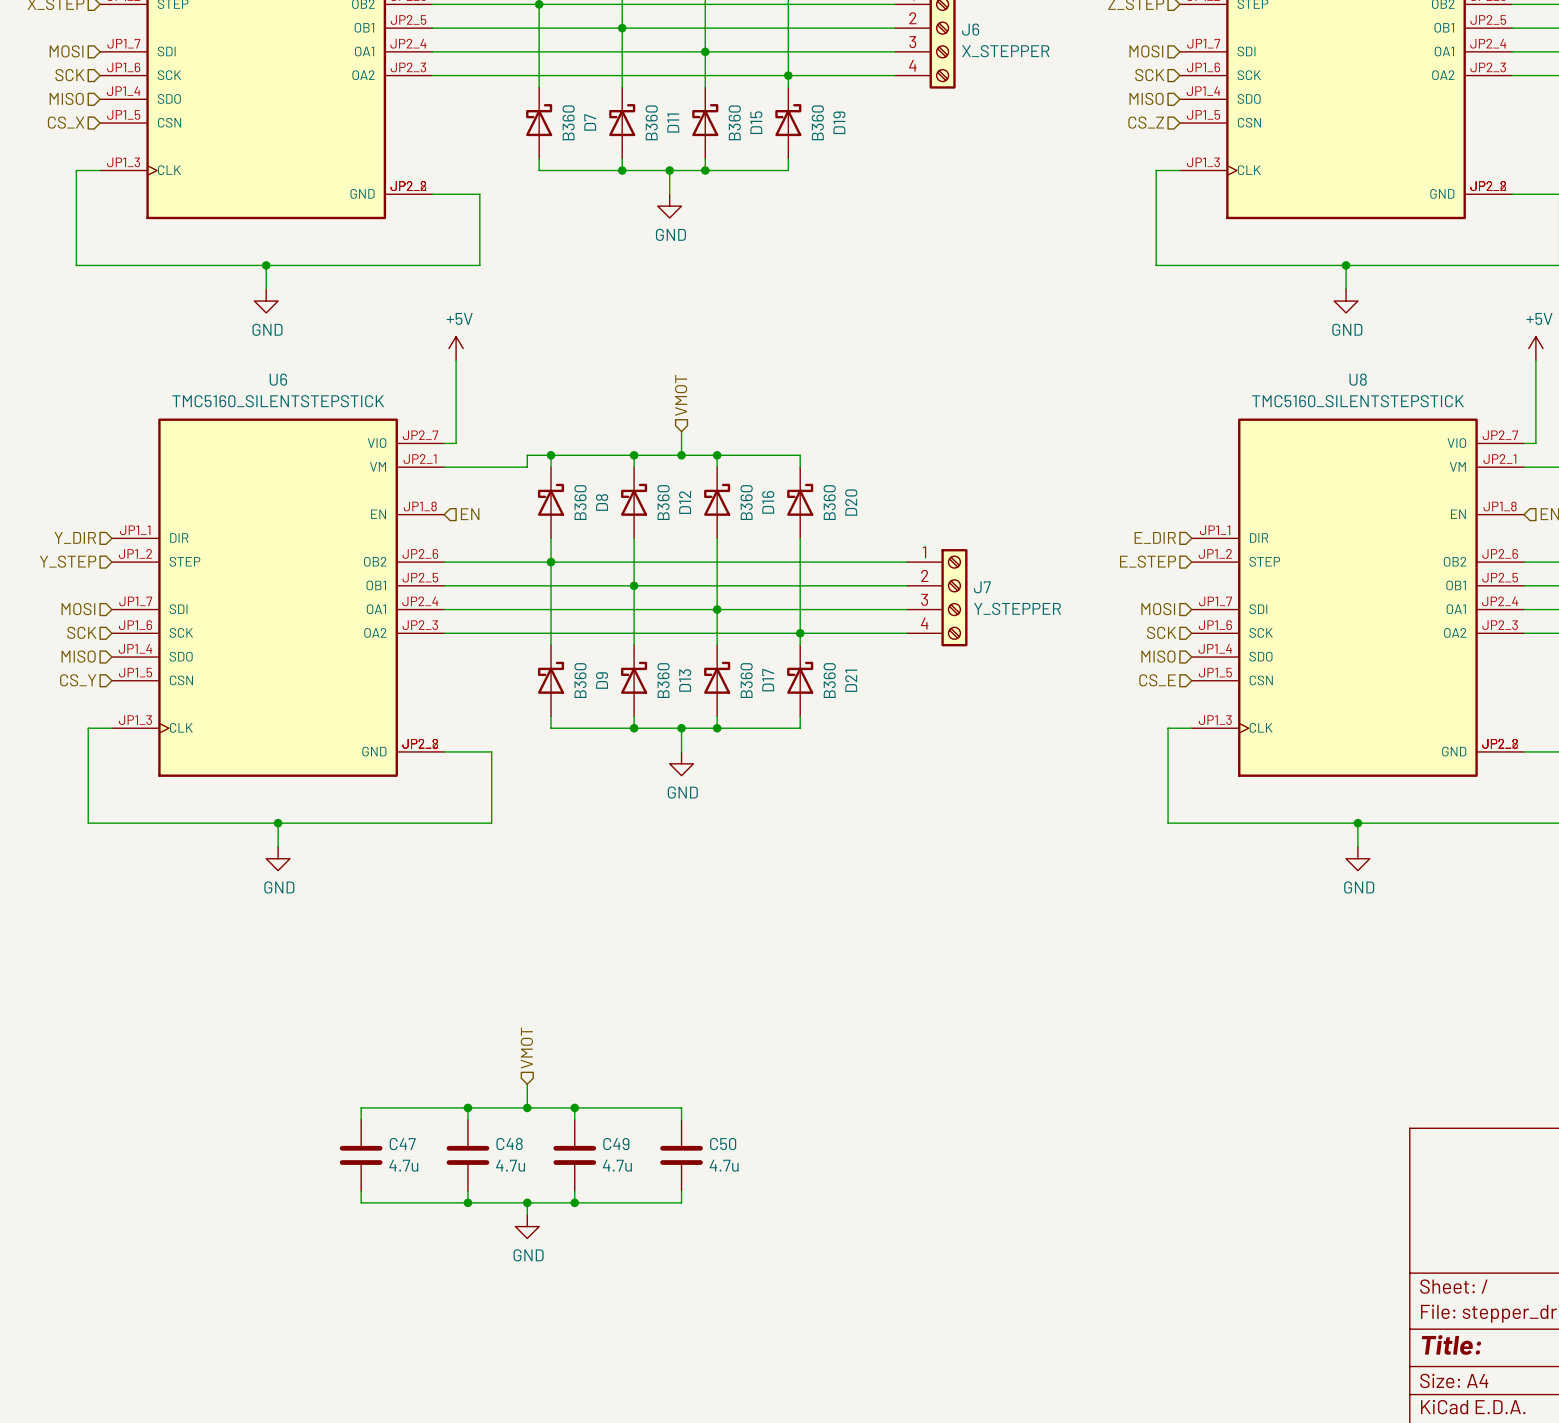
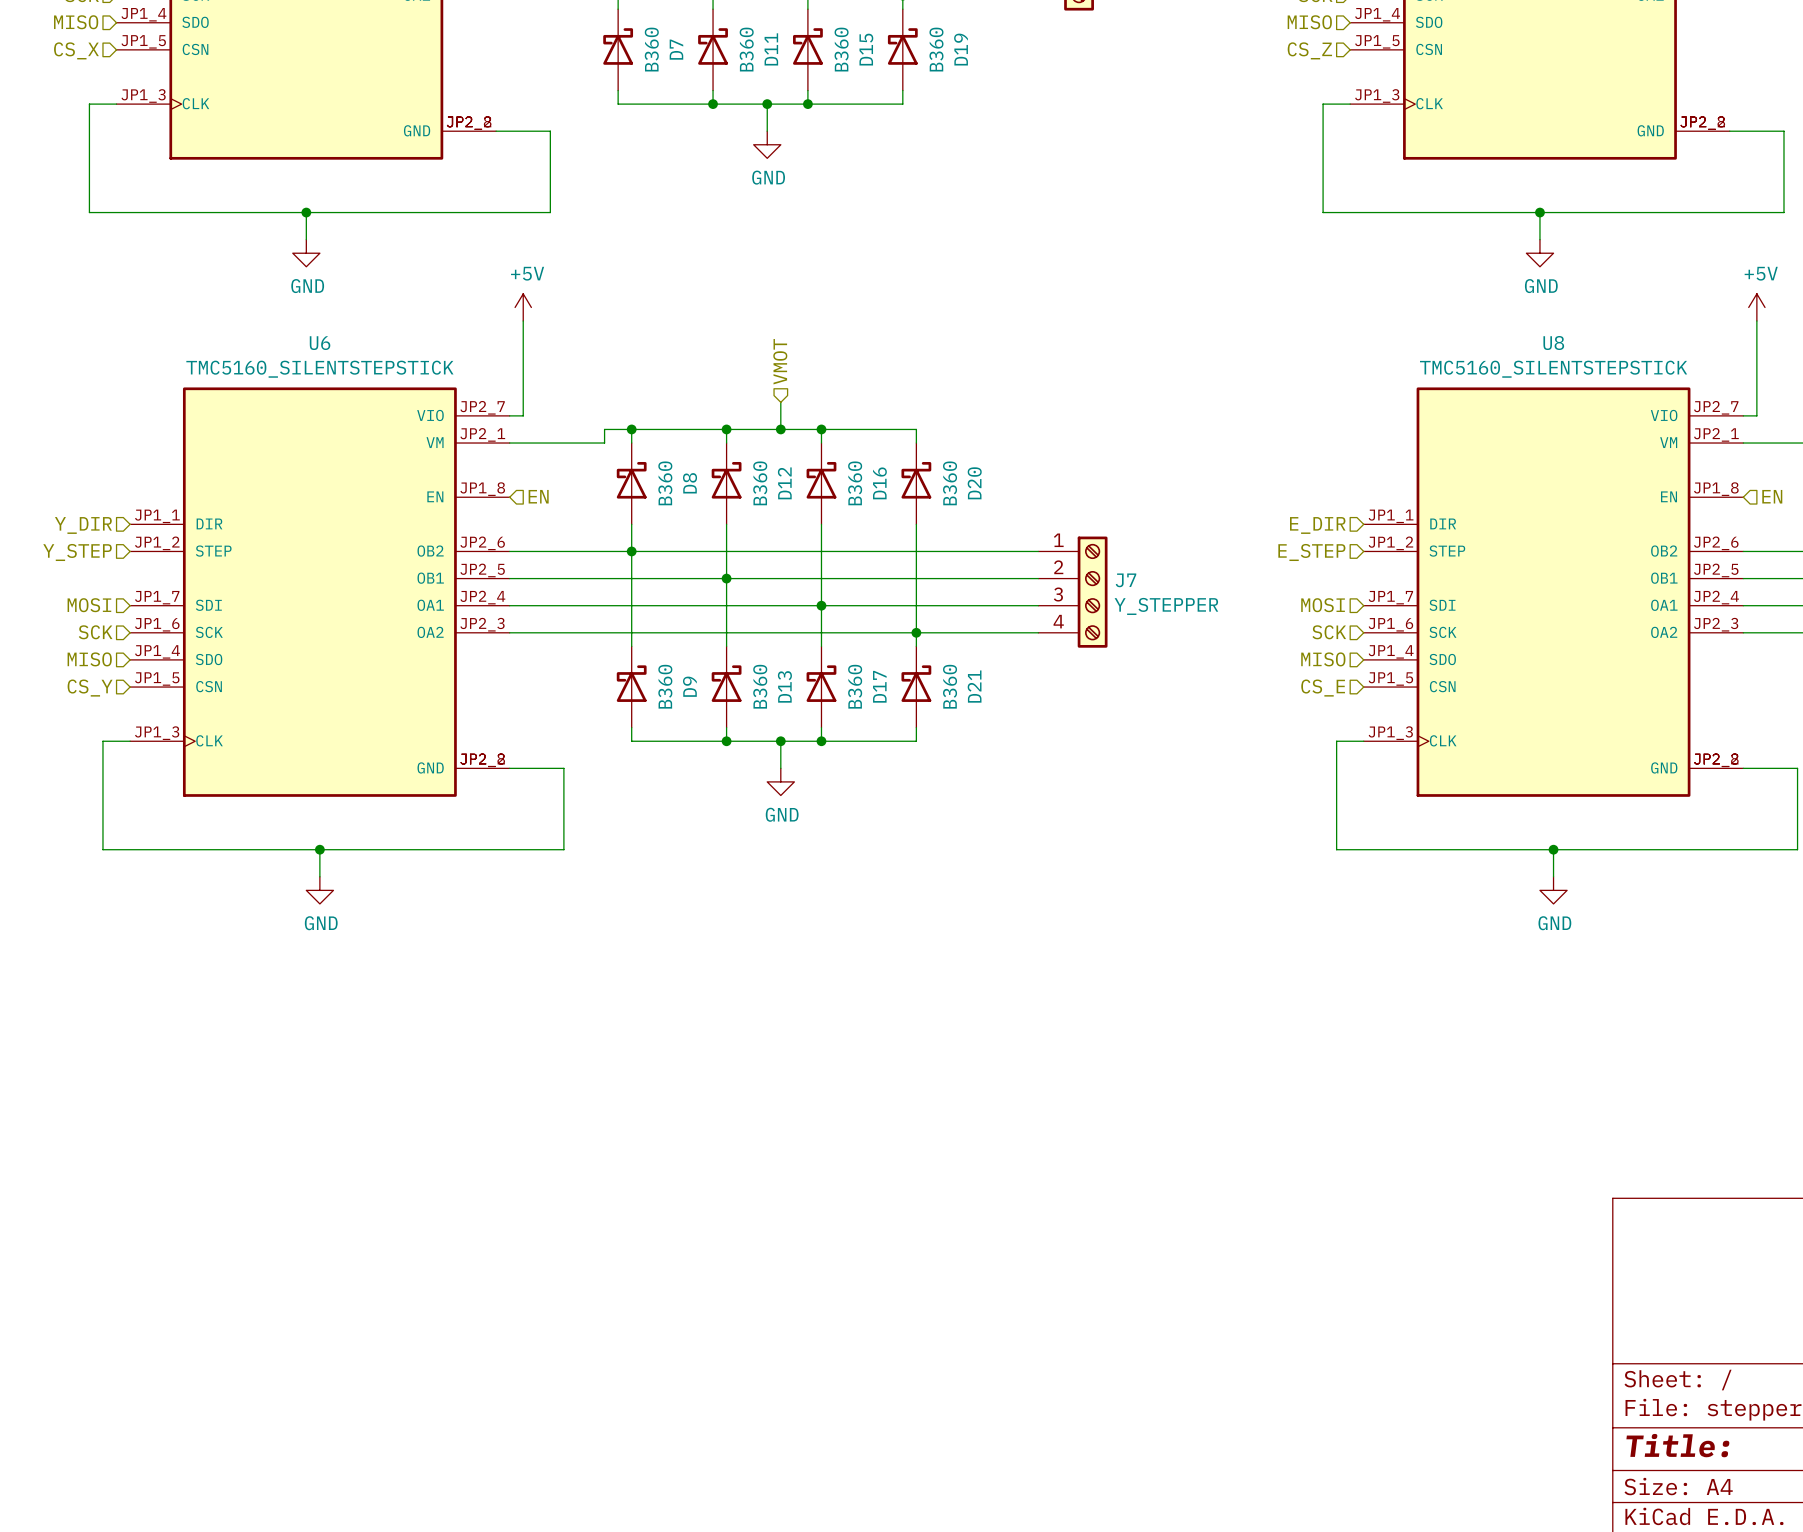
hierarchical label: VMOT (526, 1048) -> none
wire: (527, 1084) (527, 1107) -> none
wire: (467, 1107) (467, 1119) -> none
junction: (467, 1107) -> none
junction: (527, 1107) -> none
wire: (574, 1107) (574, 1119) -> none
junction: (574, 1107) -> none
wire: (361, 1119) (361, 1107) (681, 1107) (681, 1119) -> none
C47: 4.7u (361, 1155) -> none
C48: 4.7u (467, 1155) -> none
C49: 4.7u (574, 1155) -> none
C50: 4.7u (681, 1155) -> none
wire: (361, 1191) (361, 1202) (681, 1202) (681, 1191) -> none
wire: (467, 1191) (467, 1202) -> none
wire: (574, 1191) (574, 1202) -> none
junction: (467, 1202) -> none
wire: (527, 1202) (527, 1214) -> none
junction: (527, 1202) -> none
junction: (574, 1202) -> none
power symbol: GND (527, 1226) -> none

